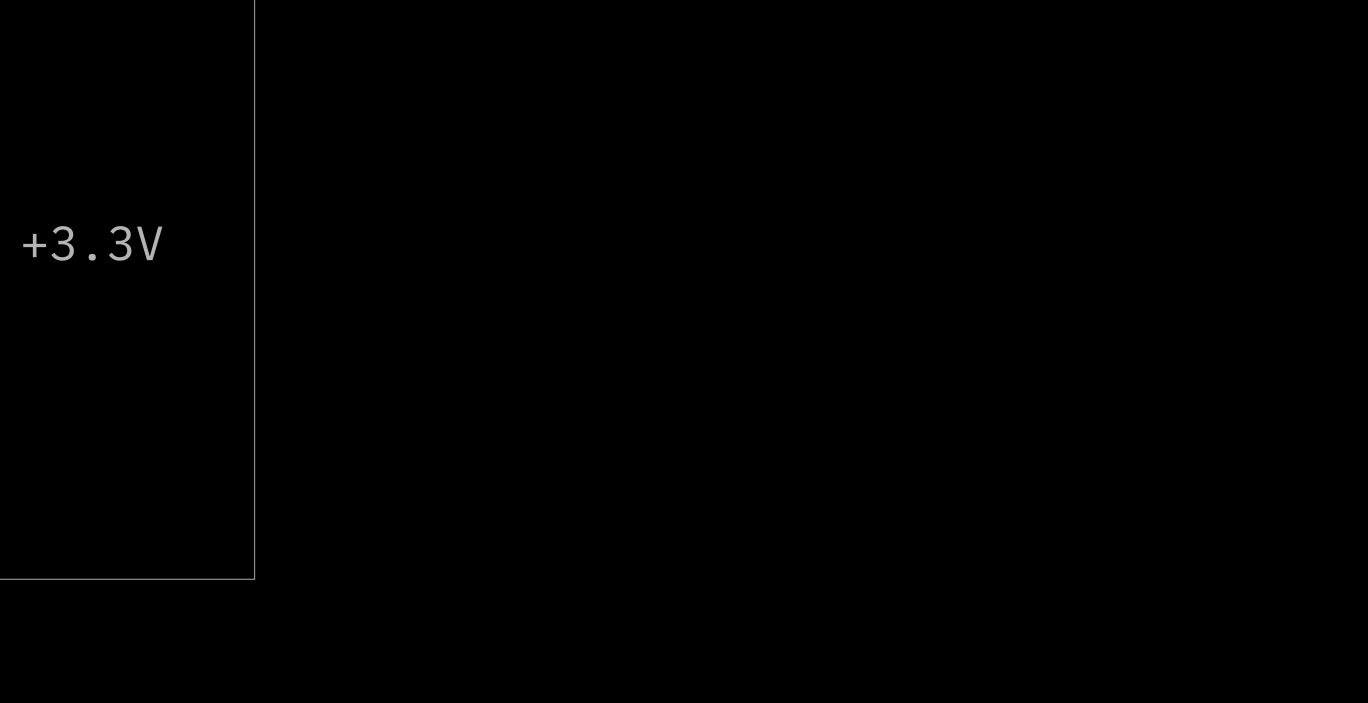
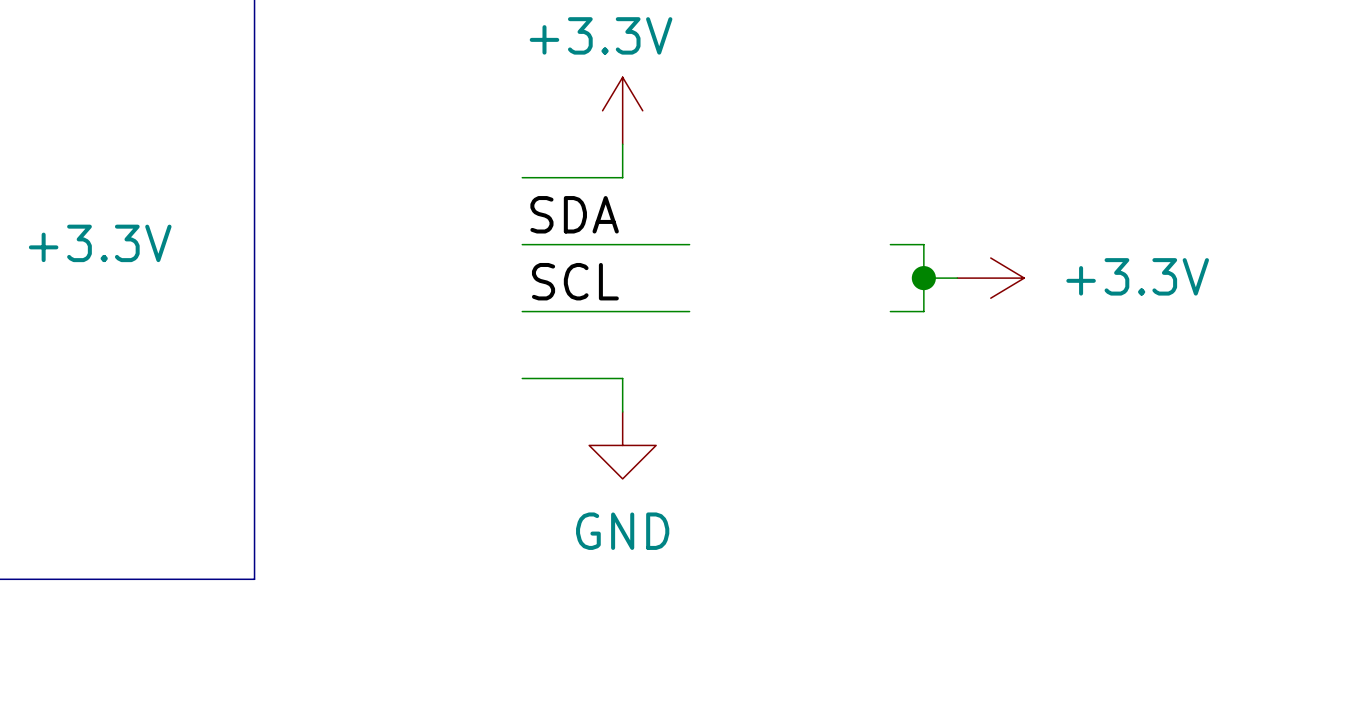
power symbol: none -> +3.3V (622, 110)
wire: none -> (622, 144) (622, 177) (522, 177)
label: none -> SDA (574, 214)
wire: none -> (522, 244) (689, 244)
wire: none -> (890, 244) (923, 244) (923, 311) (890, 311)
wire: none -> (923, 278) (957, 278)
junction: none -> (923, 278)
power symbol: none -> +3.3V (990, 278)
label: none -> SCL (575, 281)
wire: none -> (522, 311) (689, 311)
wire: none -> (522, 378) (622, 378) (622, 411)
power symbol: none -> GND (622, 445)

